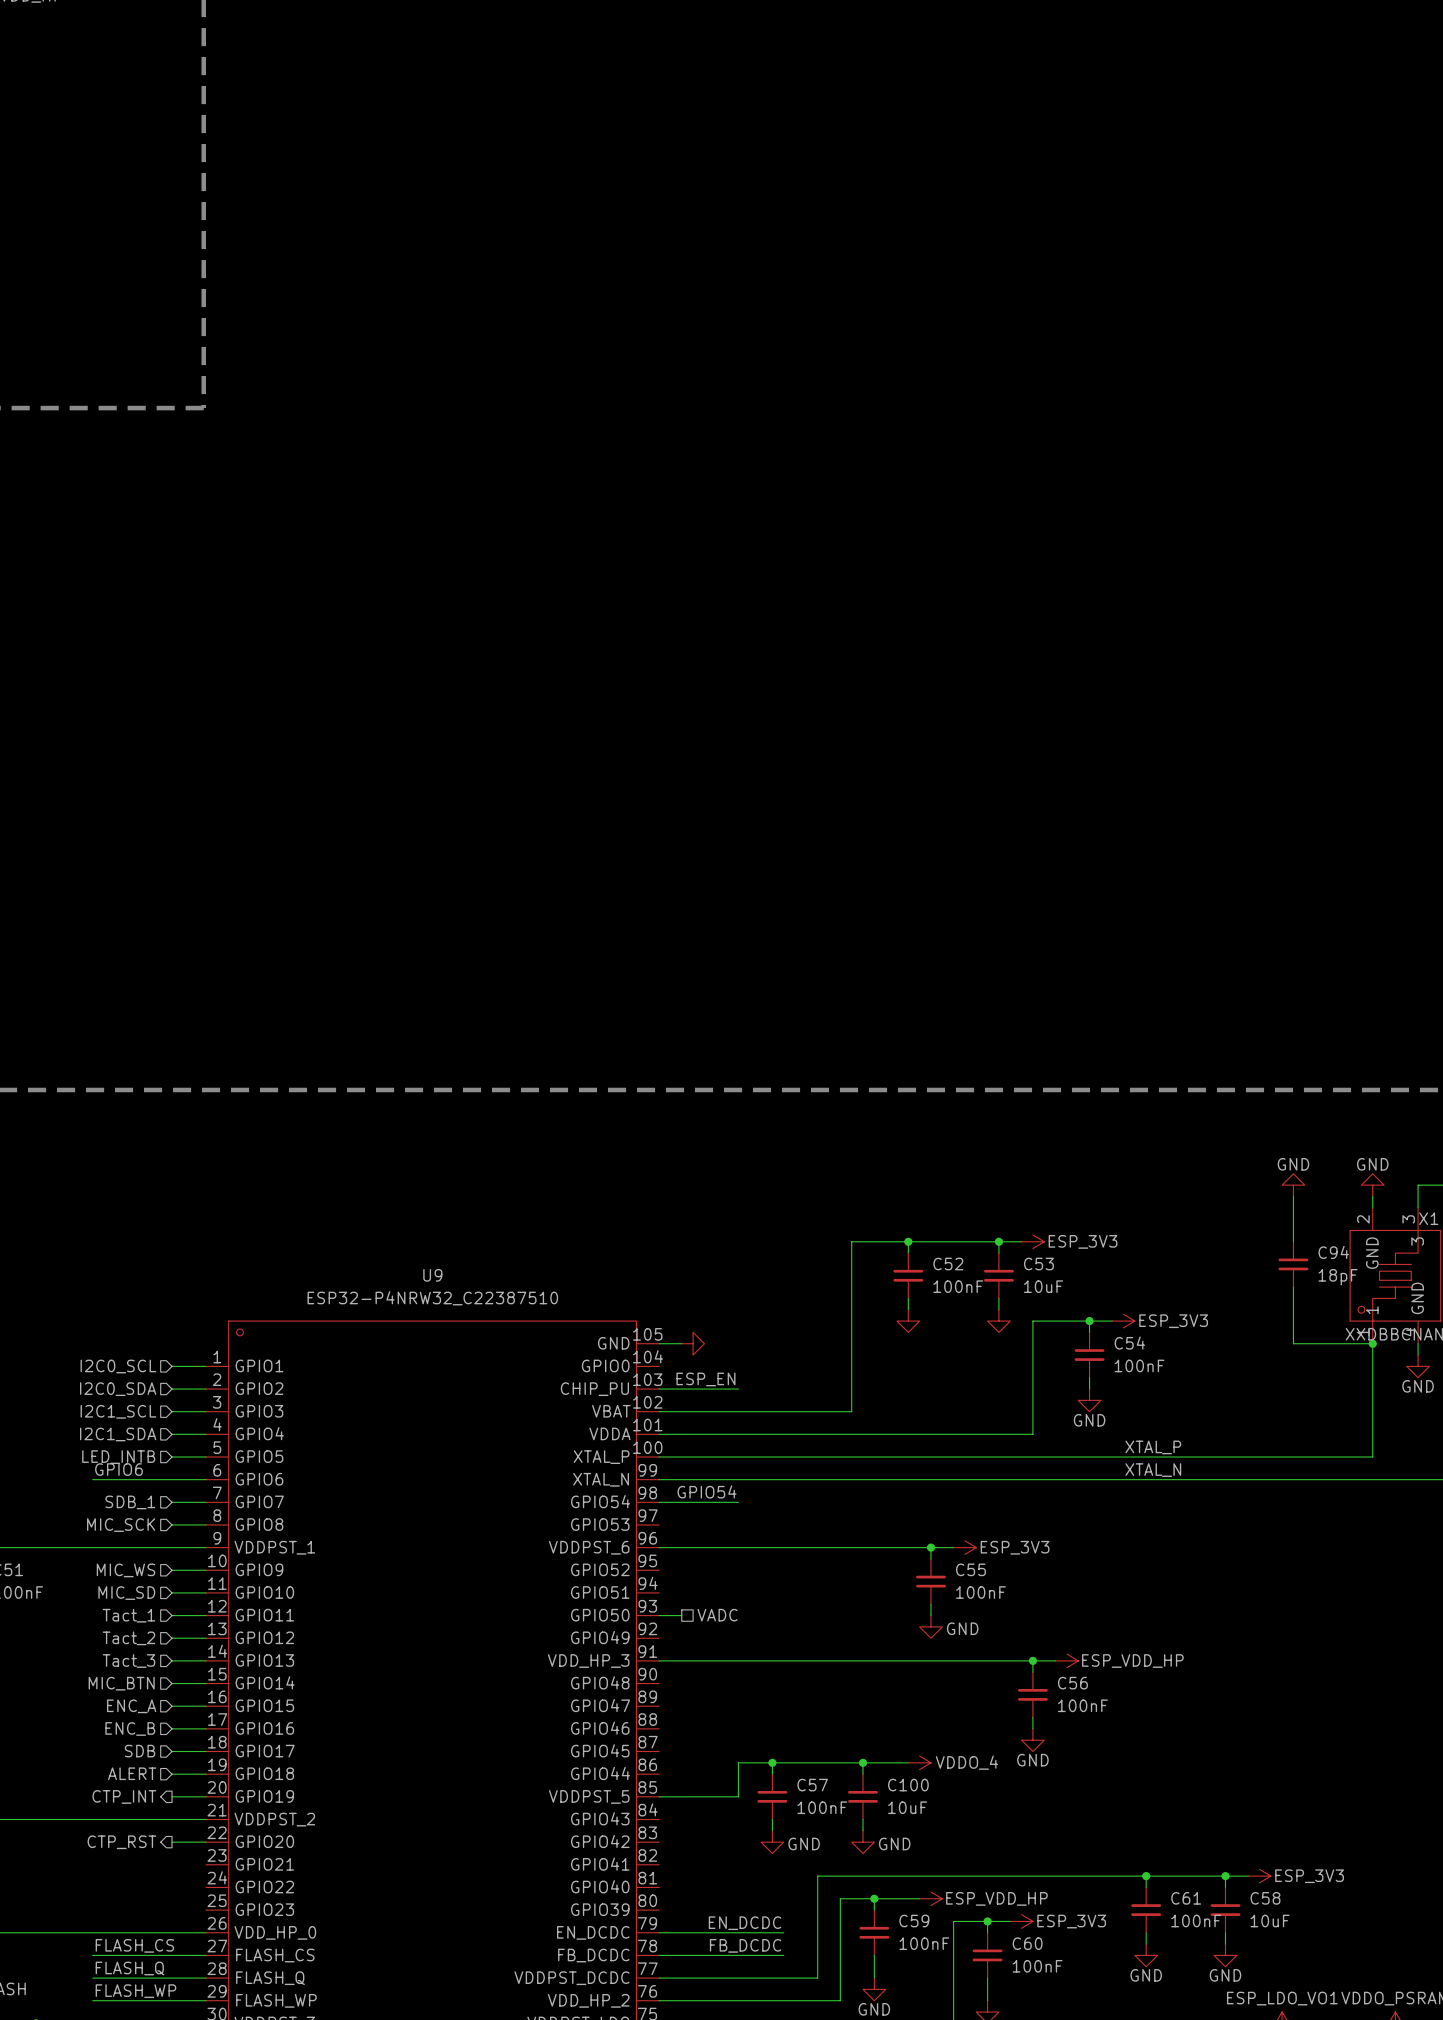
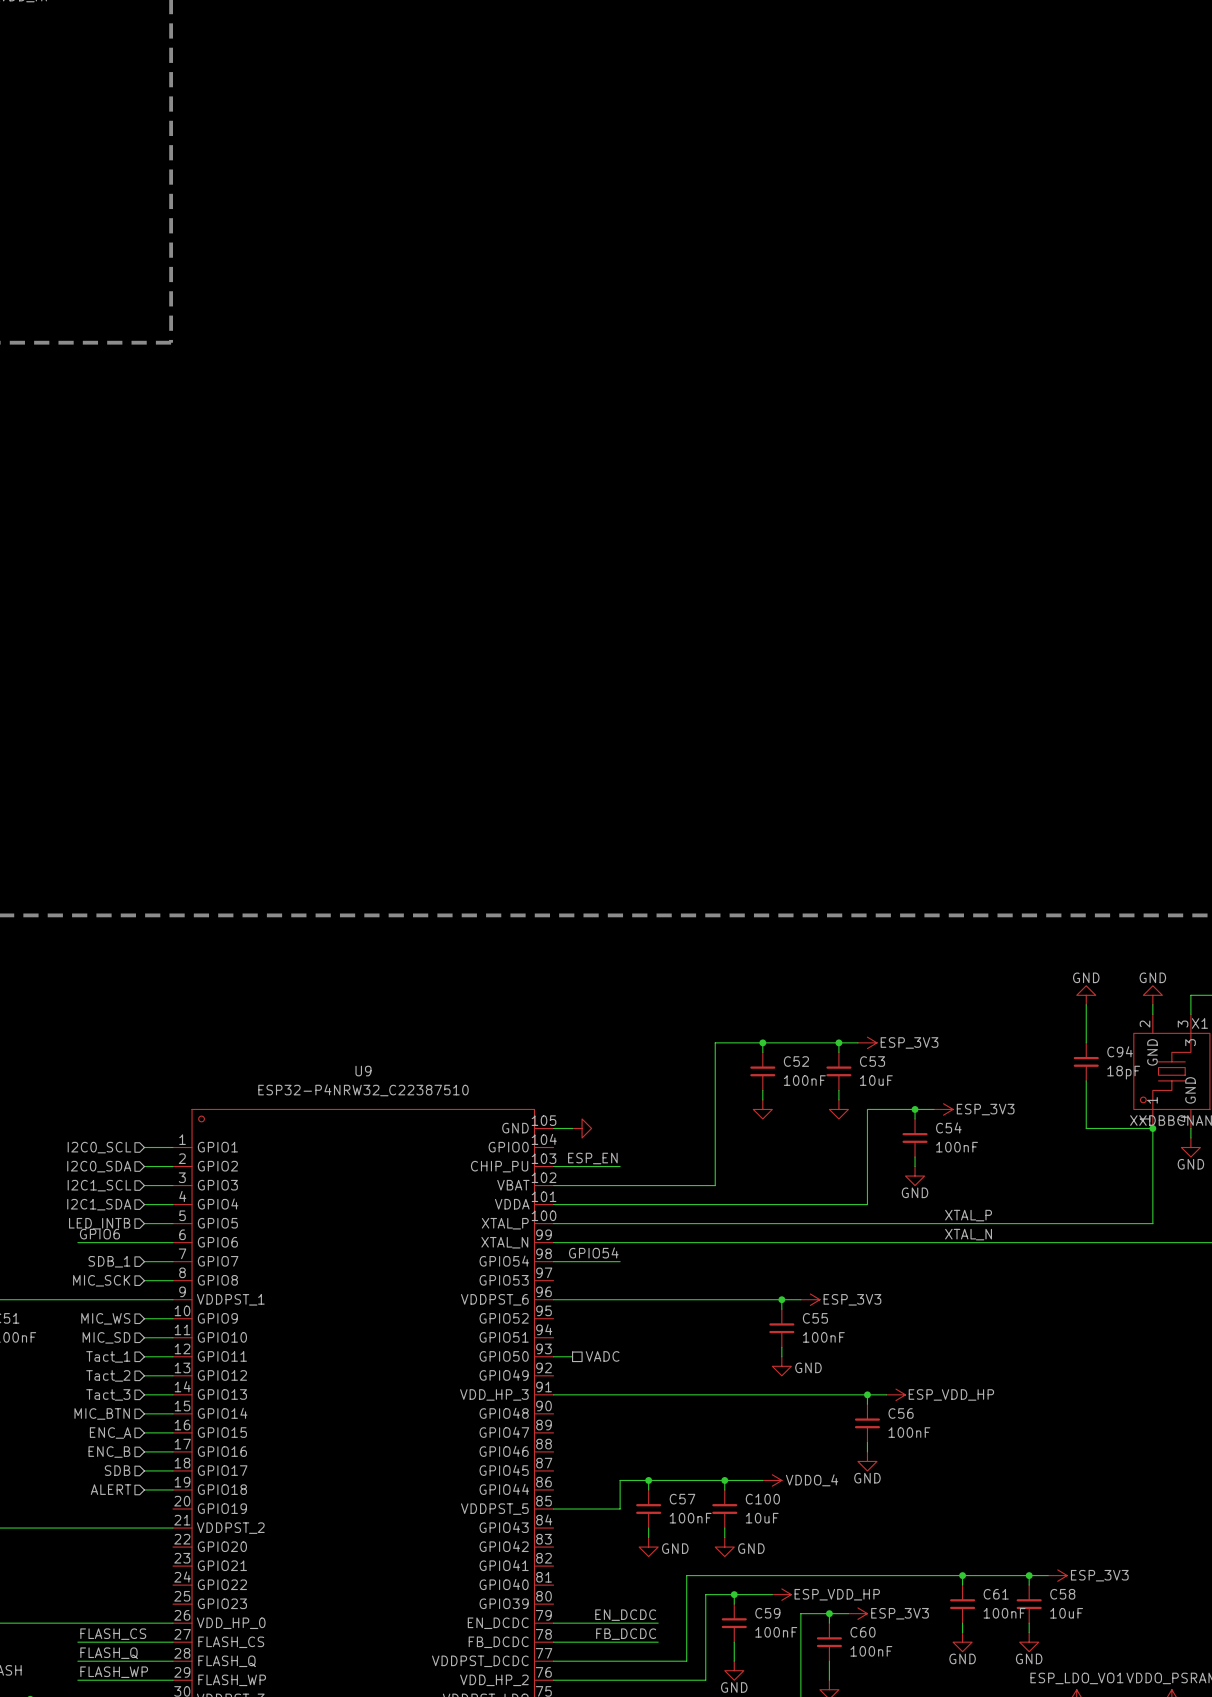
hierarchical label: CTP_INT (124, 1796) -> none
wire: (172, 1796) (206, 1796) -> none
hierarchical label: CTP_RST (121, 1842) -> none
wire: (172, 1842) (206, 1842) -> none

